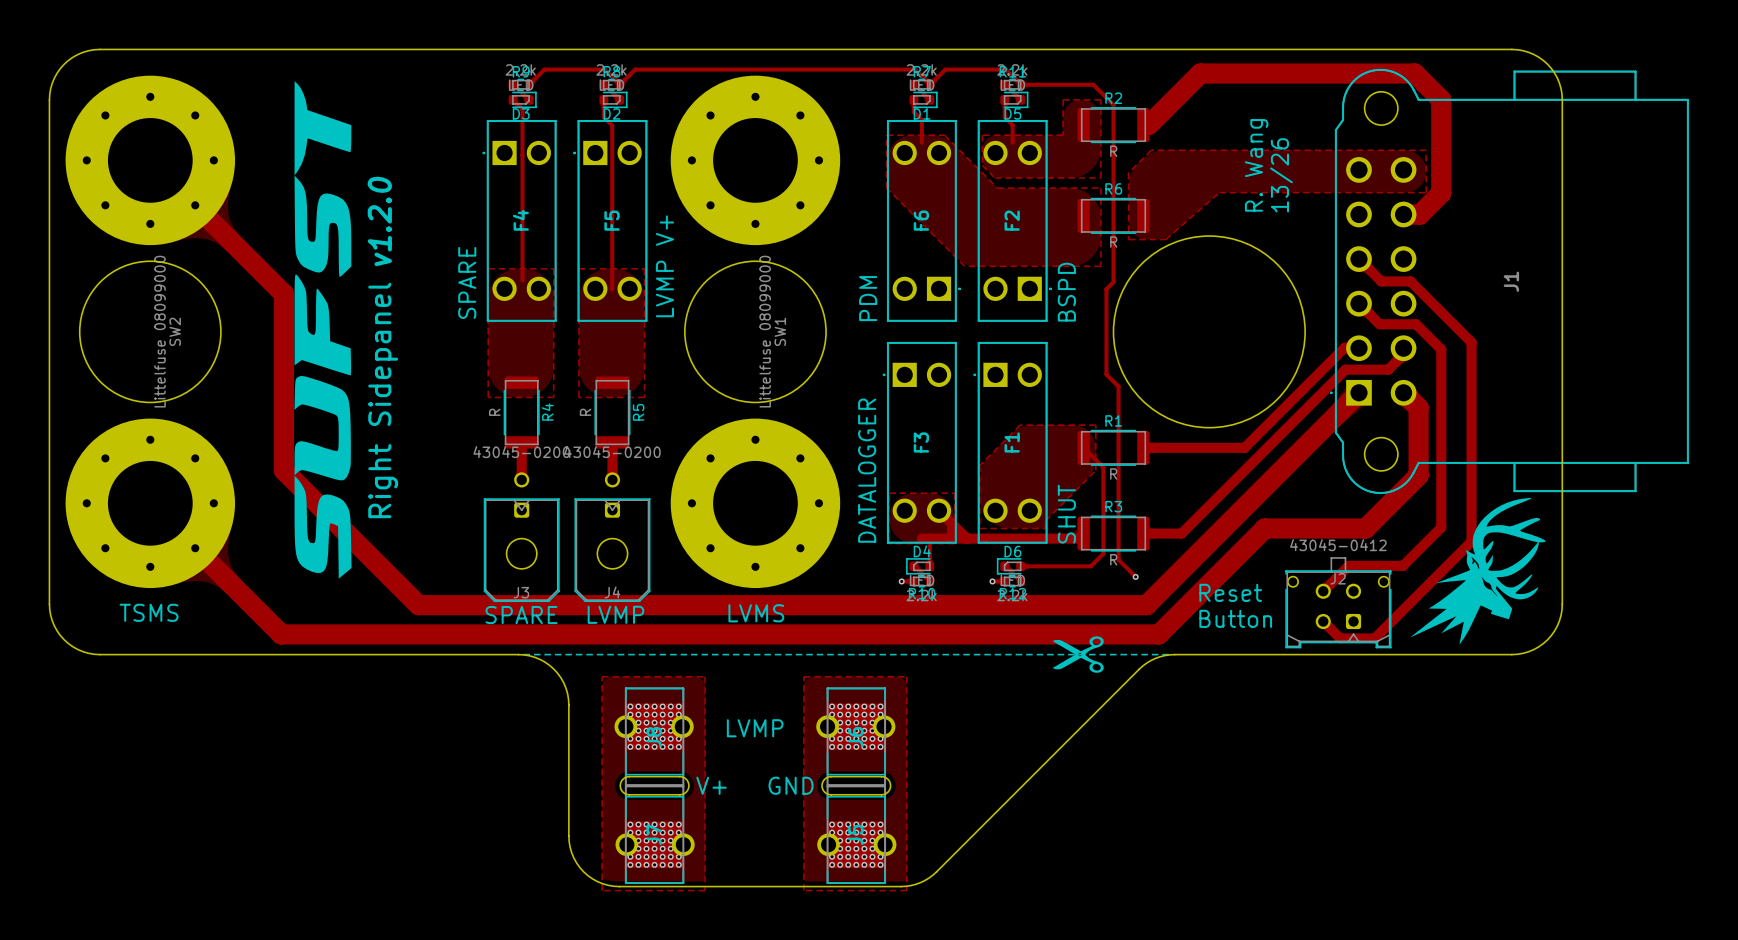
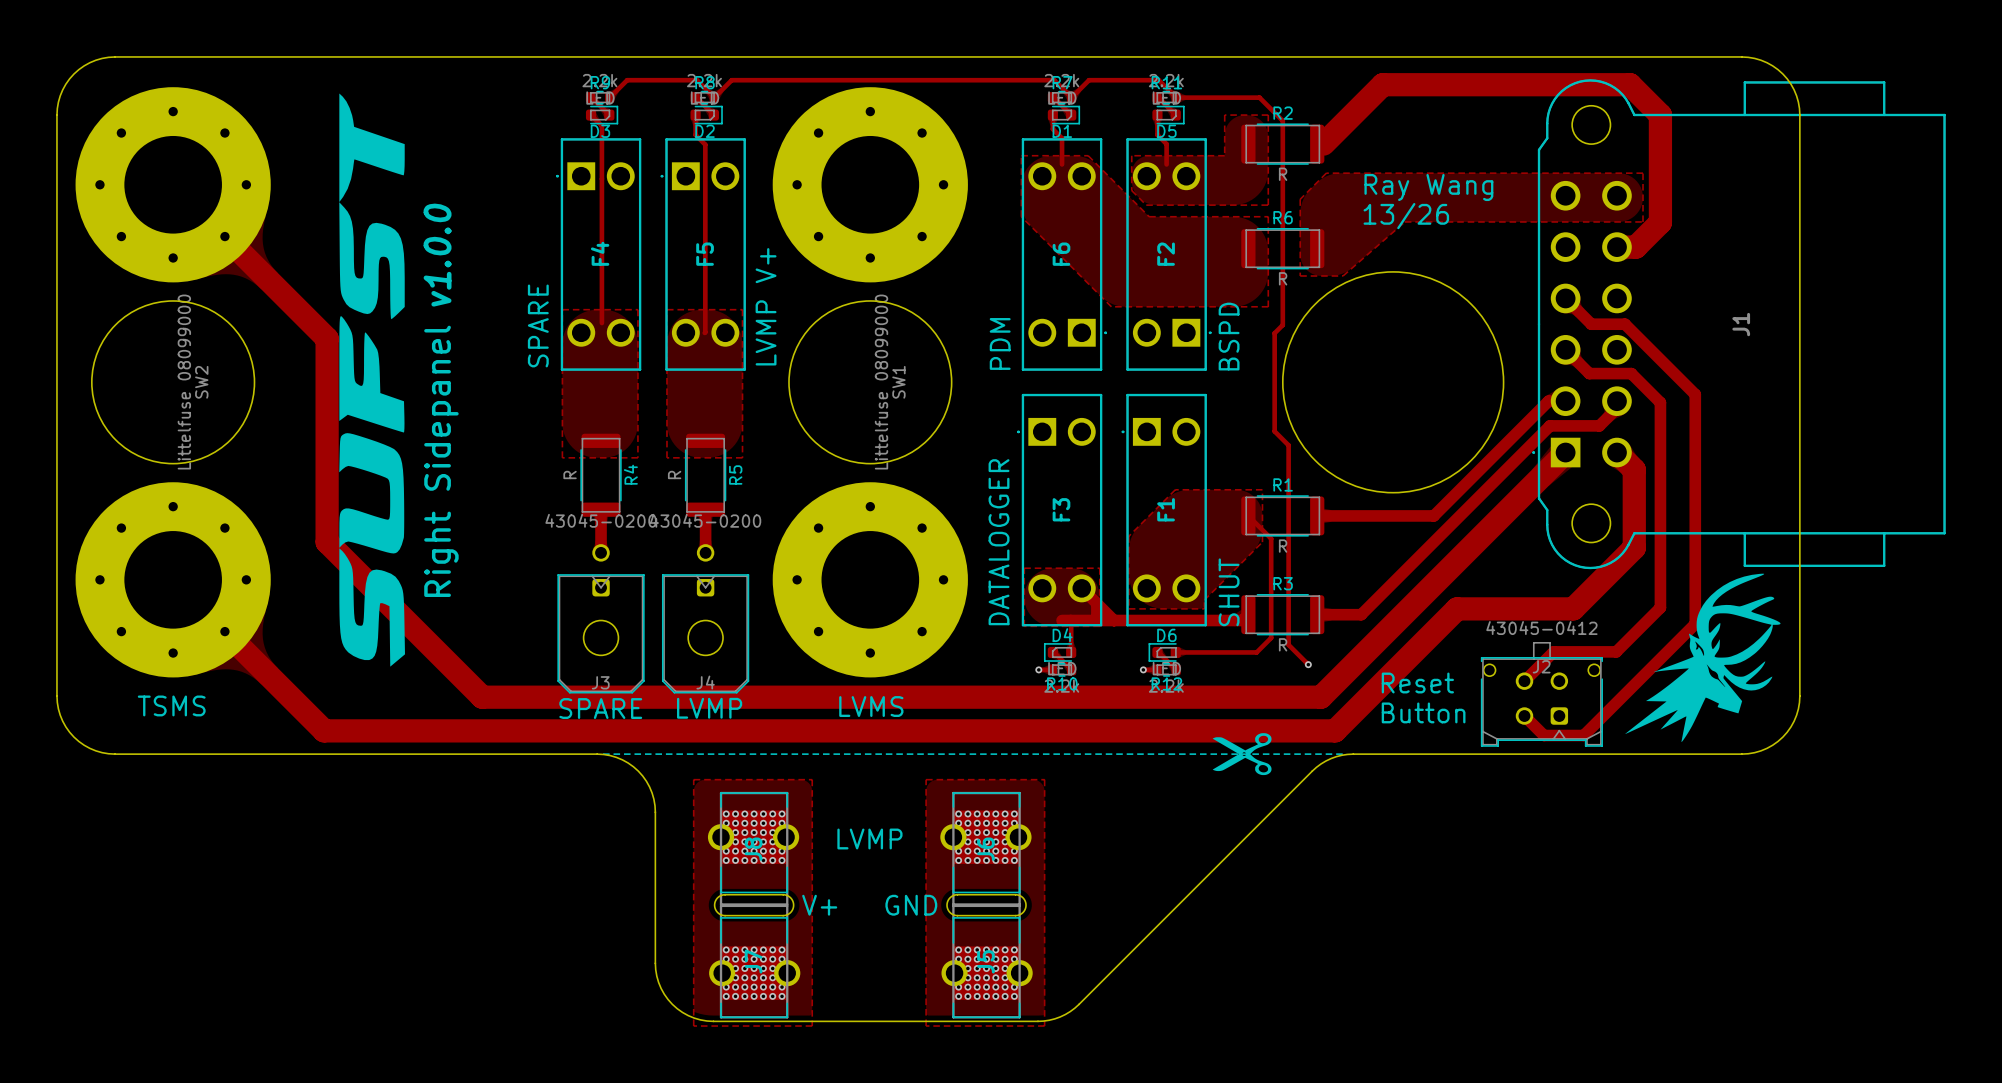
text: R. Wang (1256, 165) -> Ray Wang (1428, 187)
text rotation: 0° (1281, 175) -> 90° clockwise (1406, 216)
text: v1.2.0 (379, 221) -> v1.0.0 (437, 255)

